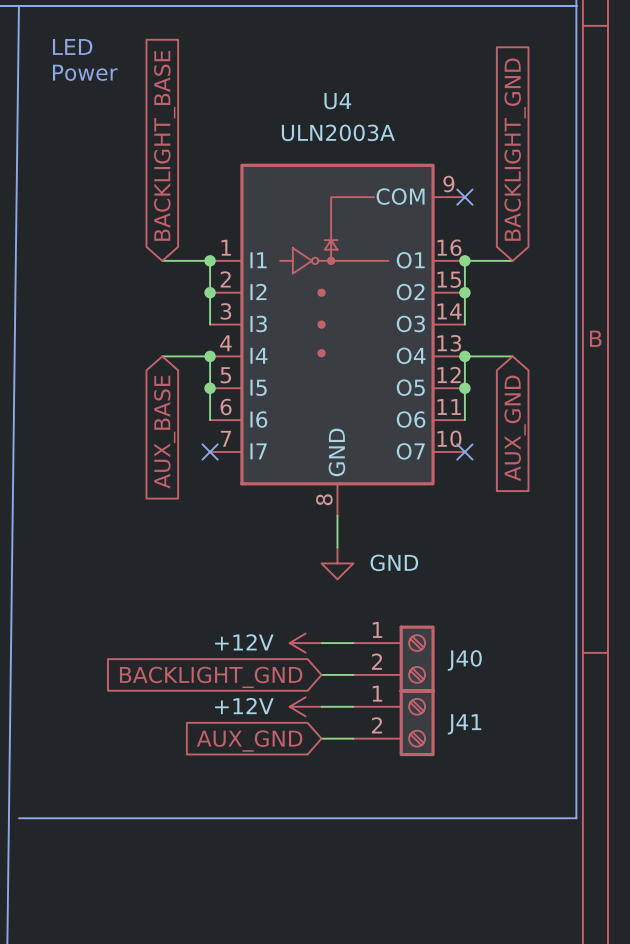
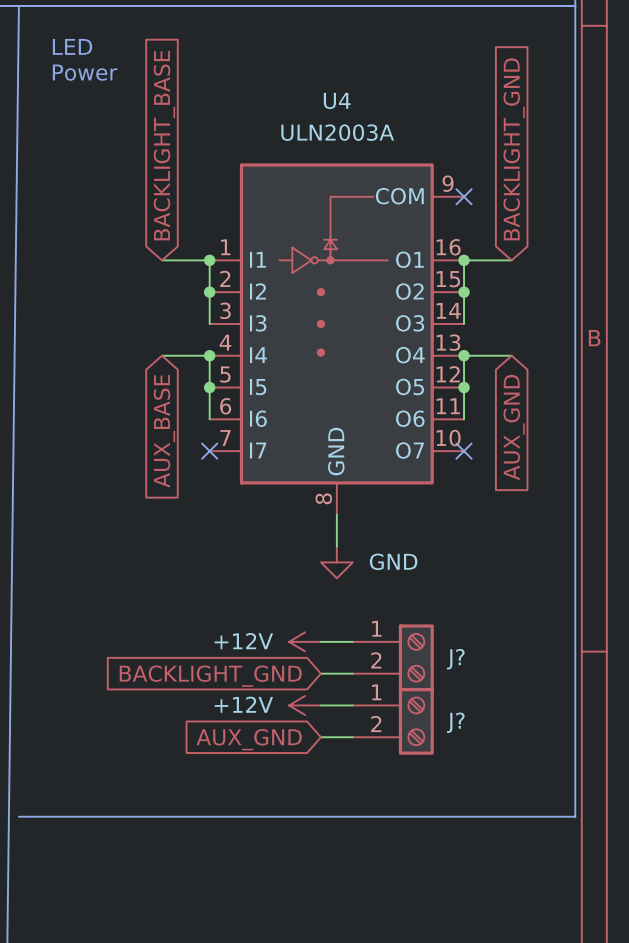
J40 name: J40 (464, 660) -> J? (455, 659)
J41 name: J41 (464, 724) -> J? (455, 722)

